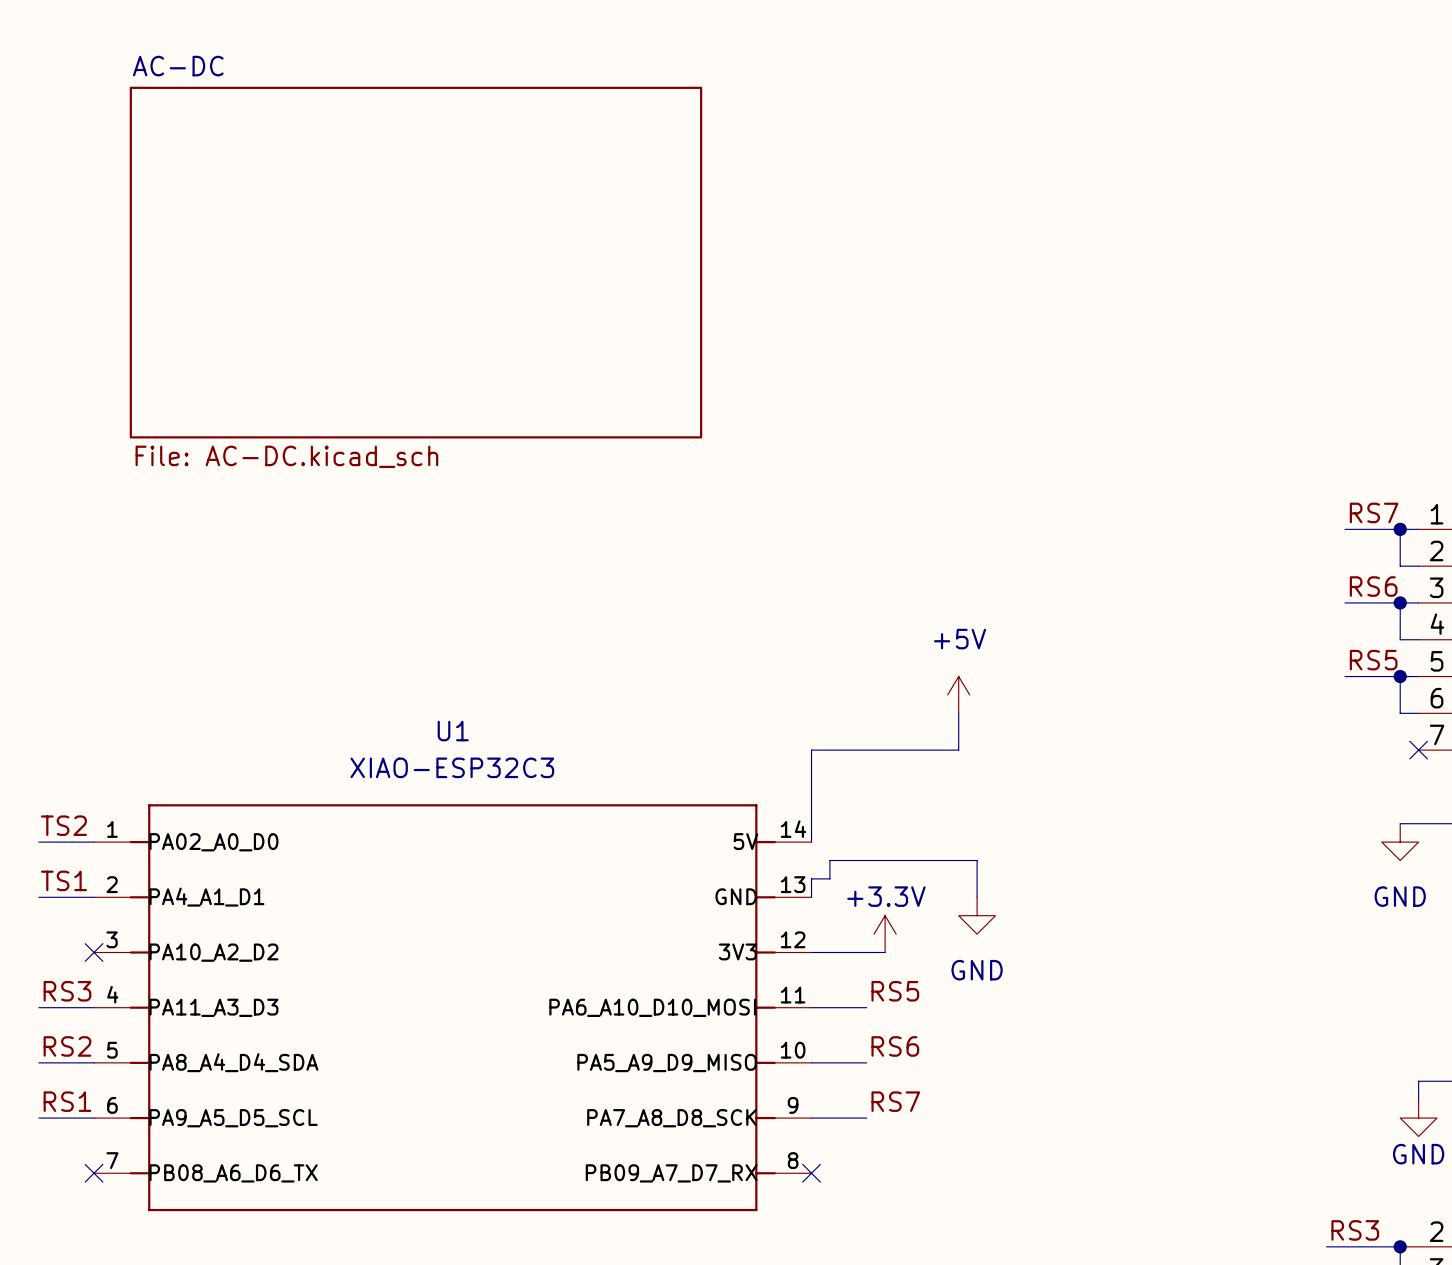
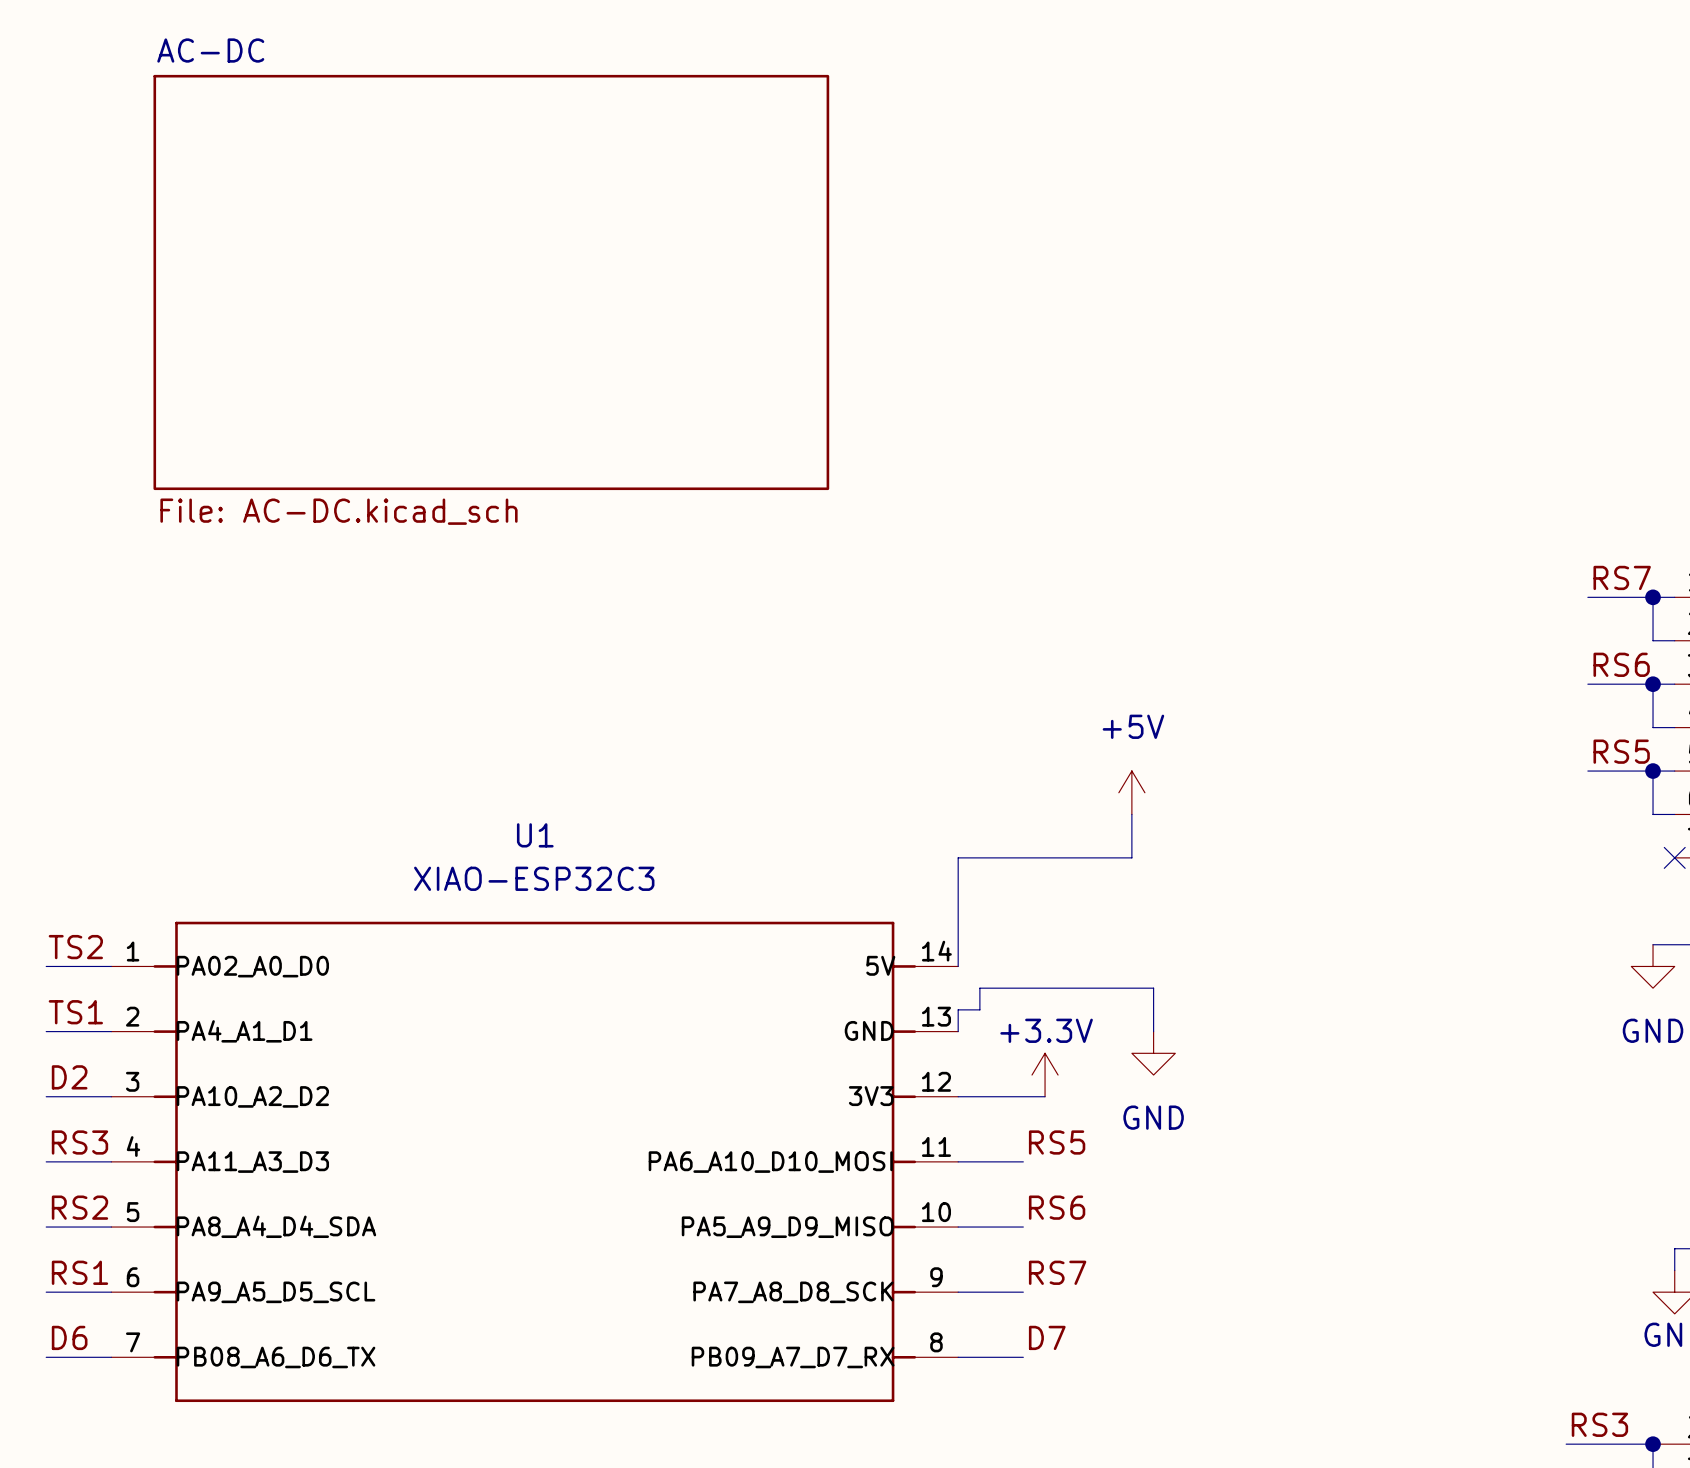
label: none -> D2 (69, 1077)
wire: none -> (46, 1096) (111, 1096)
no-connect mark: (94, 952) -> none
label: none -> D6 (69, 1337)
label: none -> D7 (1047, 1337)
wire: none -> (46, 1357) (111, 1357)
no-connect mark: (94, 1173) -> none
wire: none -> (958, 1357) (1023, 1357)
no-connect mark: (811, 1173) -> none

